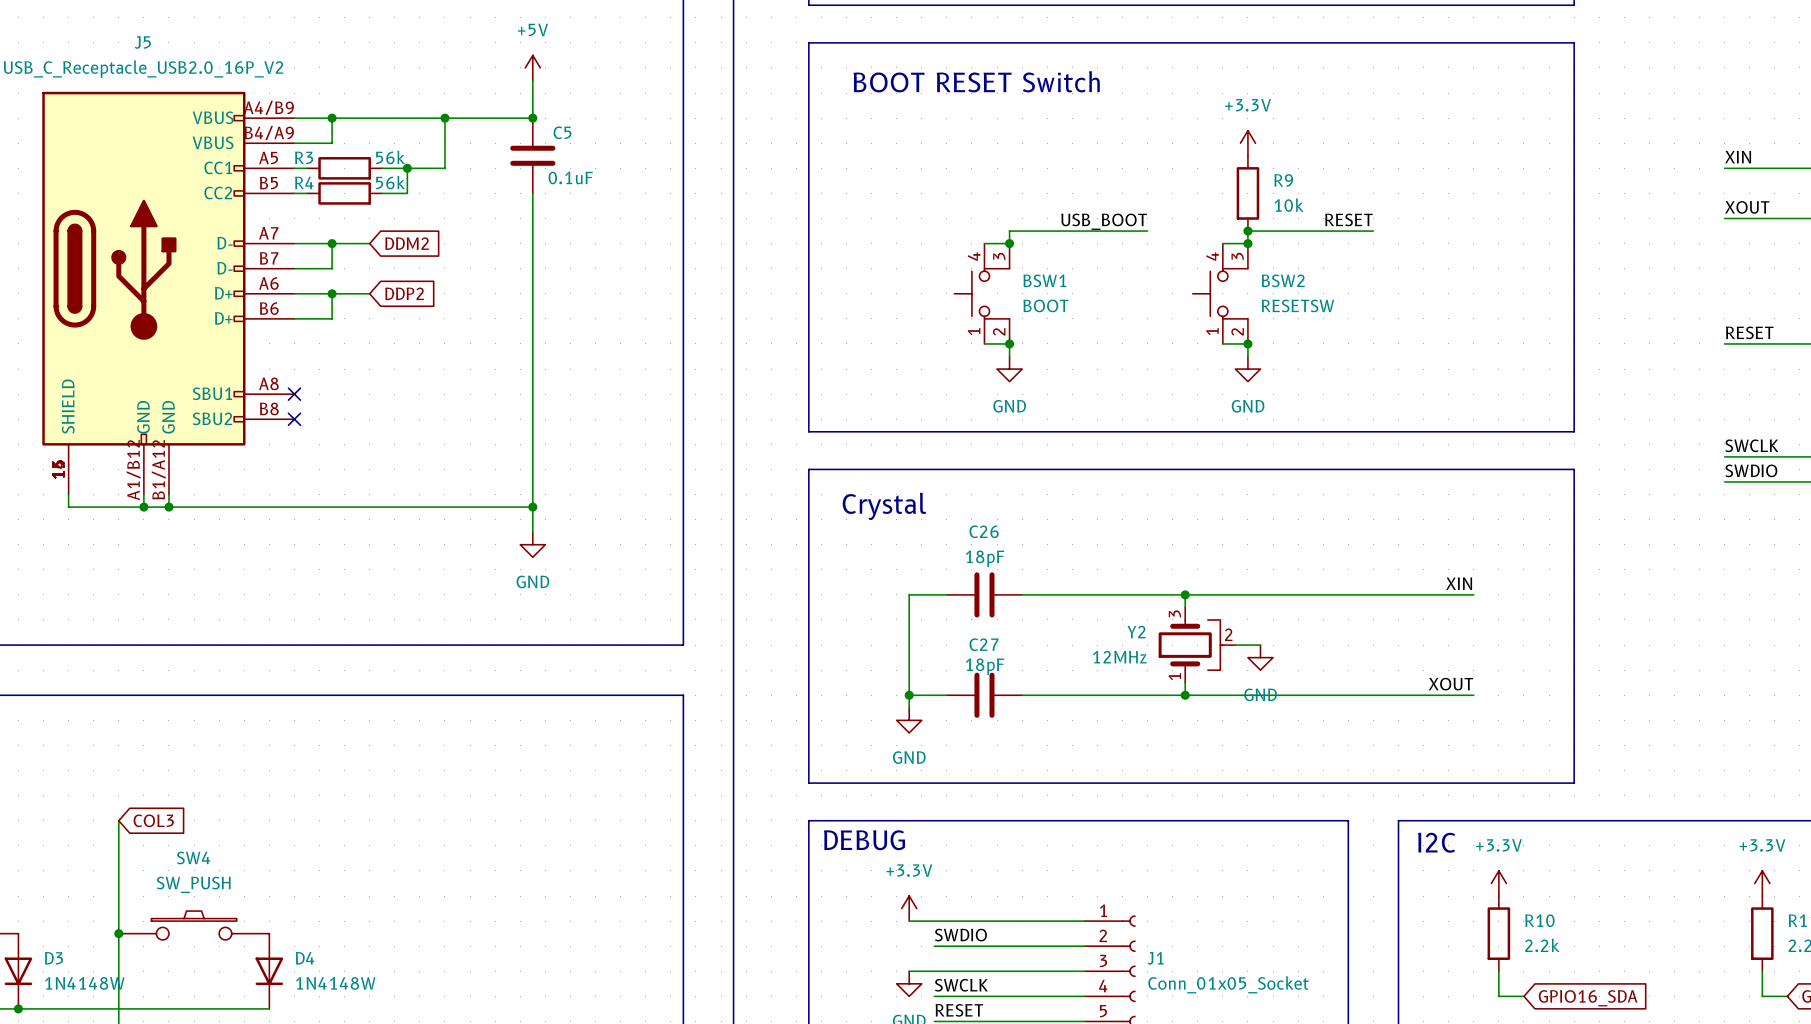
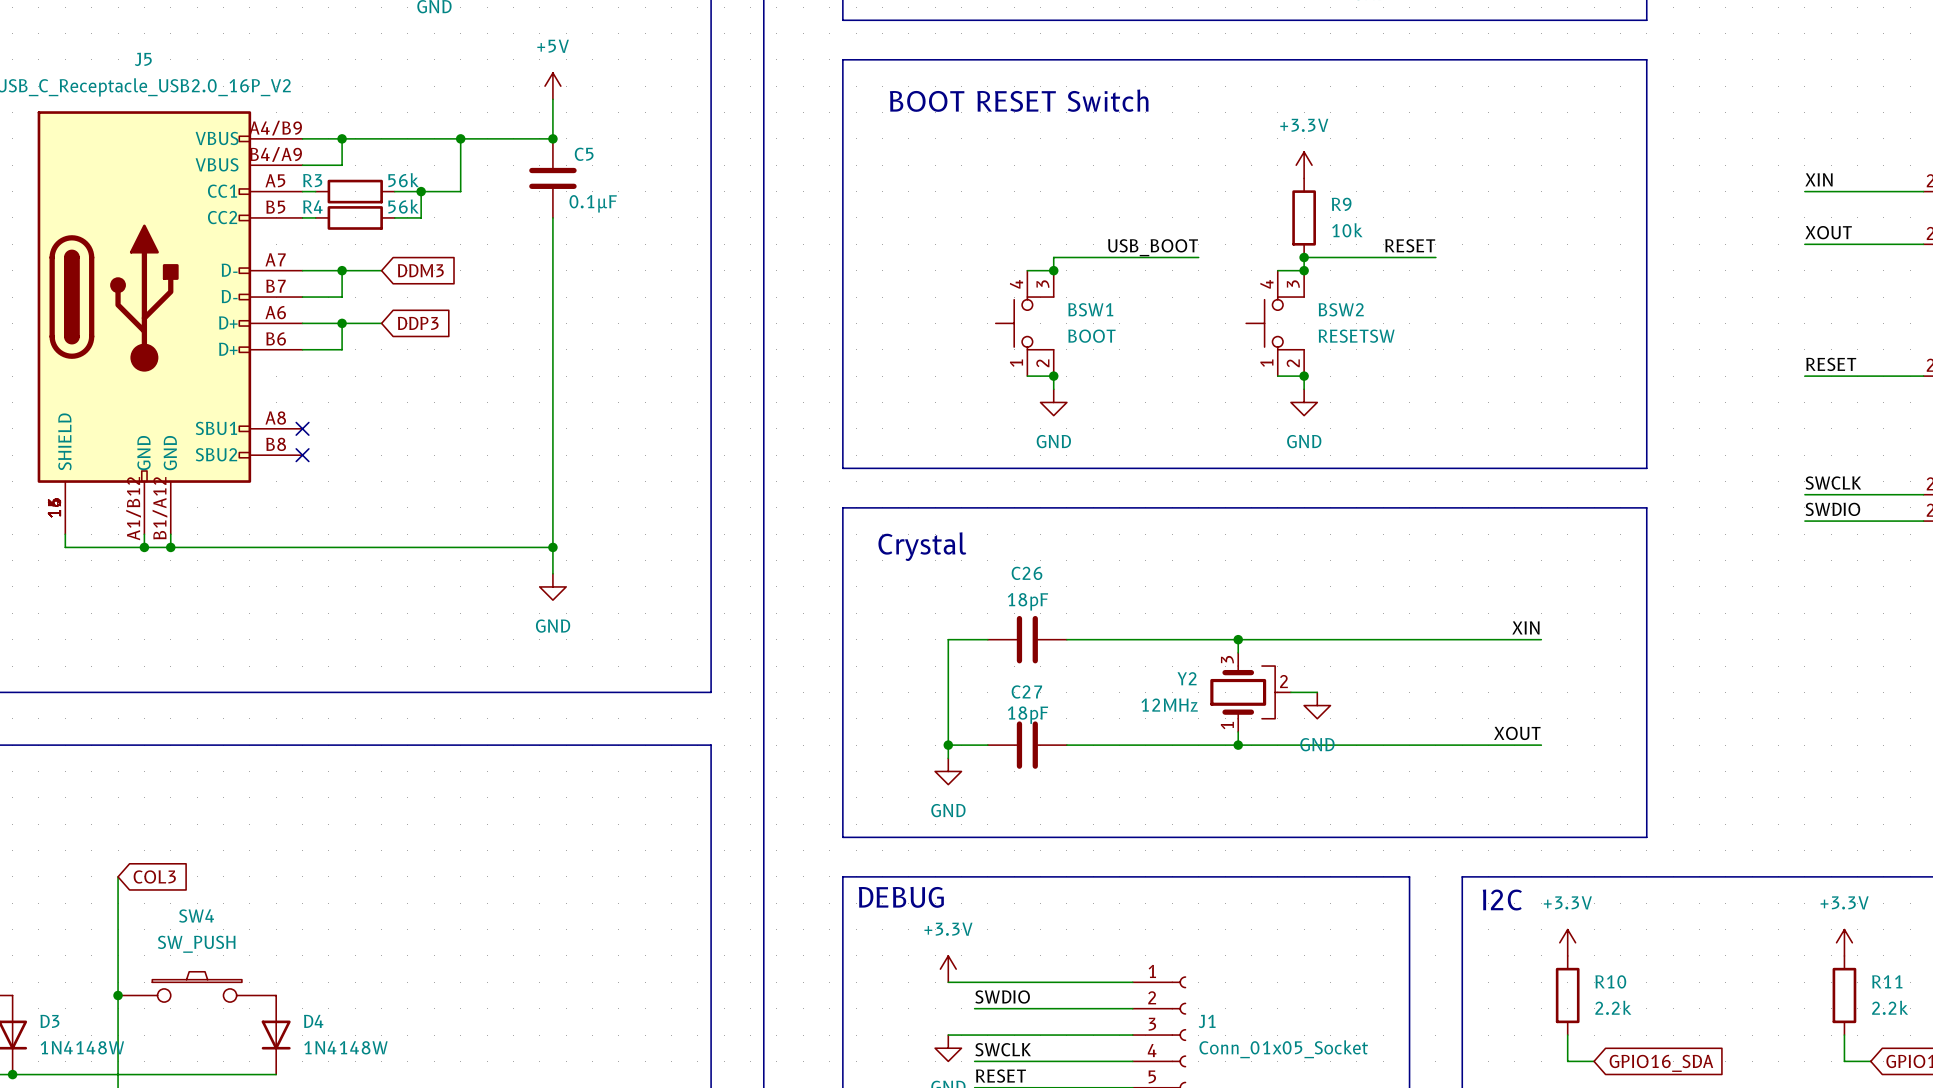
C5 value: 0.1uF (570, 177) -> 0.1µF (593, 203)
global label: DDM2 (407, 243) -> DDM3 (420, 270)
global label: DDP2 (404, 293) -> DDP3 (418, 323)

